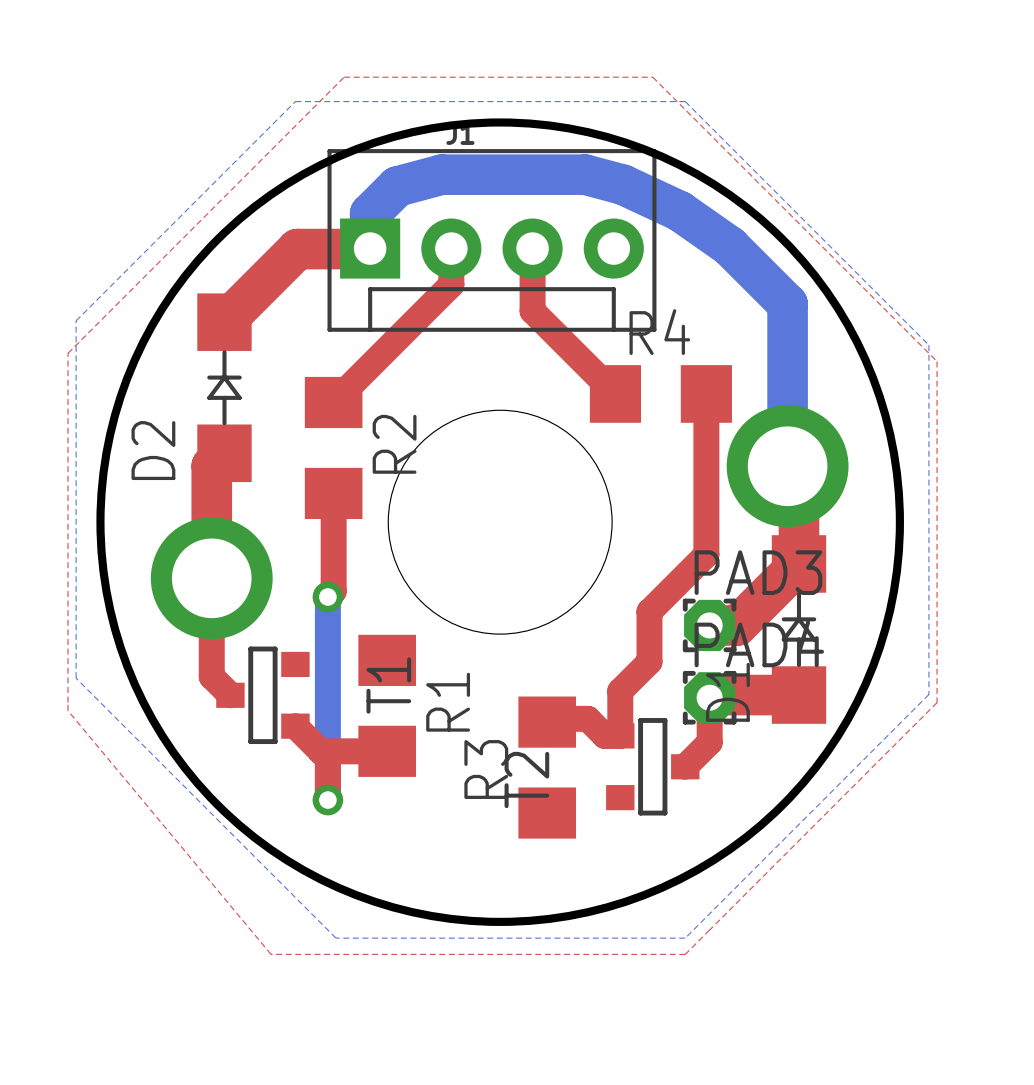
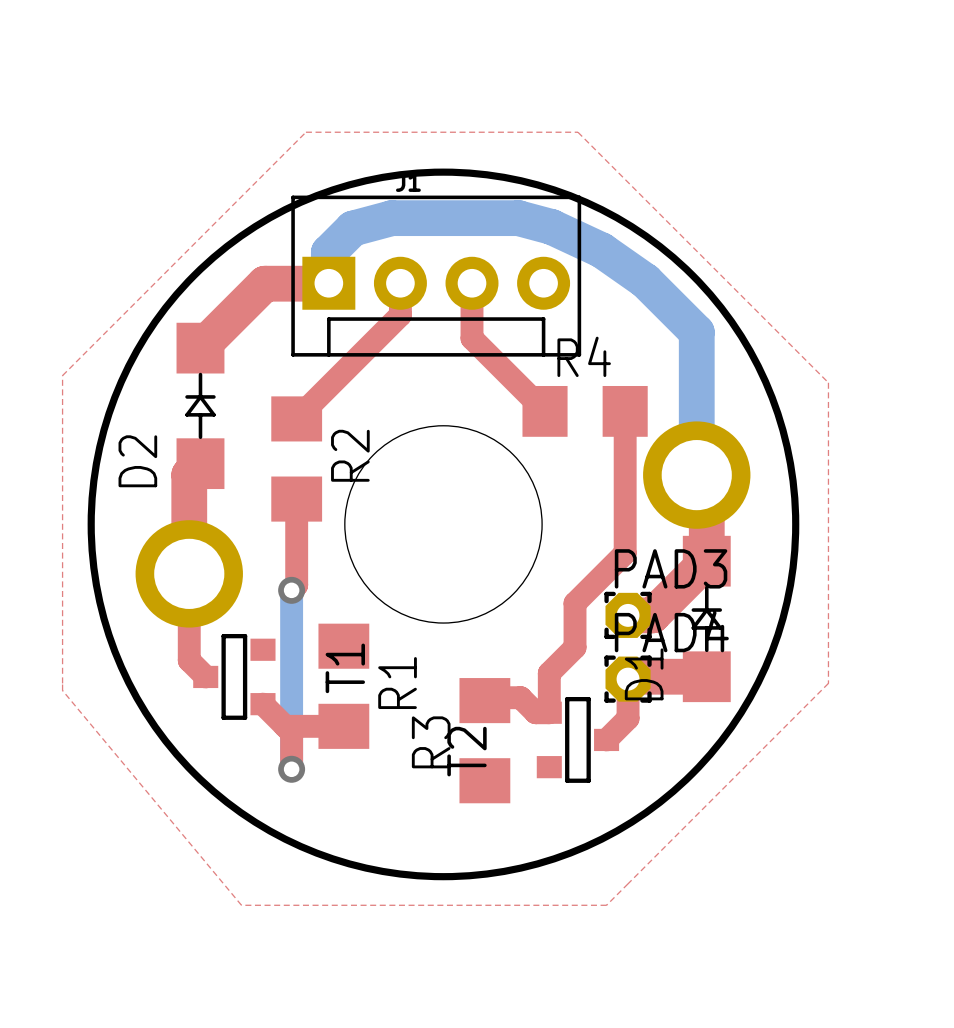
bottom zone outline: (295, 101) (76, 320) (76, 678) (336, 938) (685, 938) (928, 694) (928, 345) (685, 101) (295, 101) -> none

